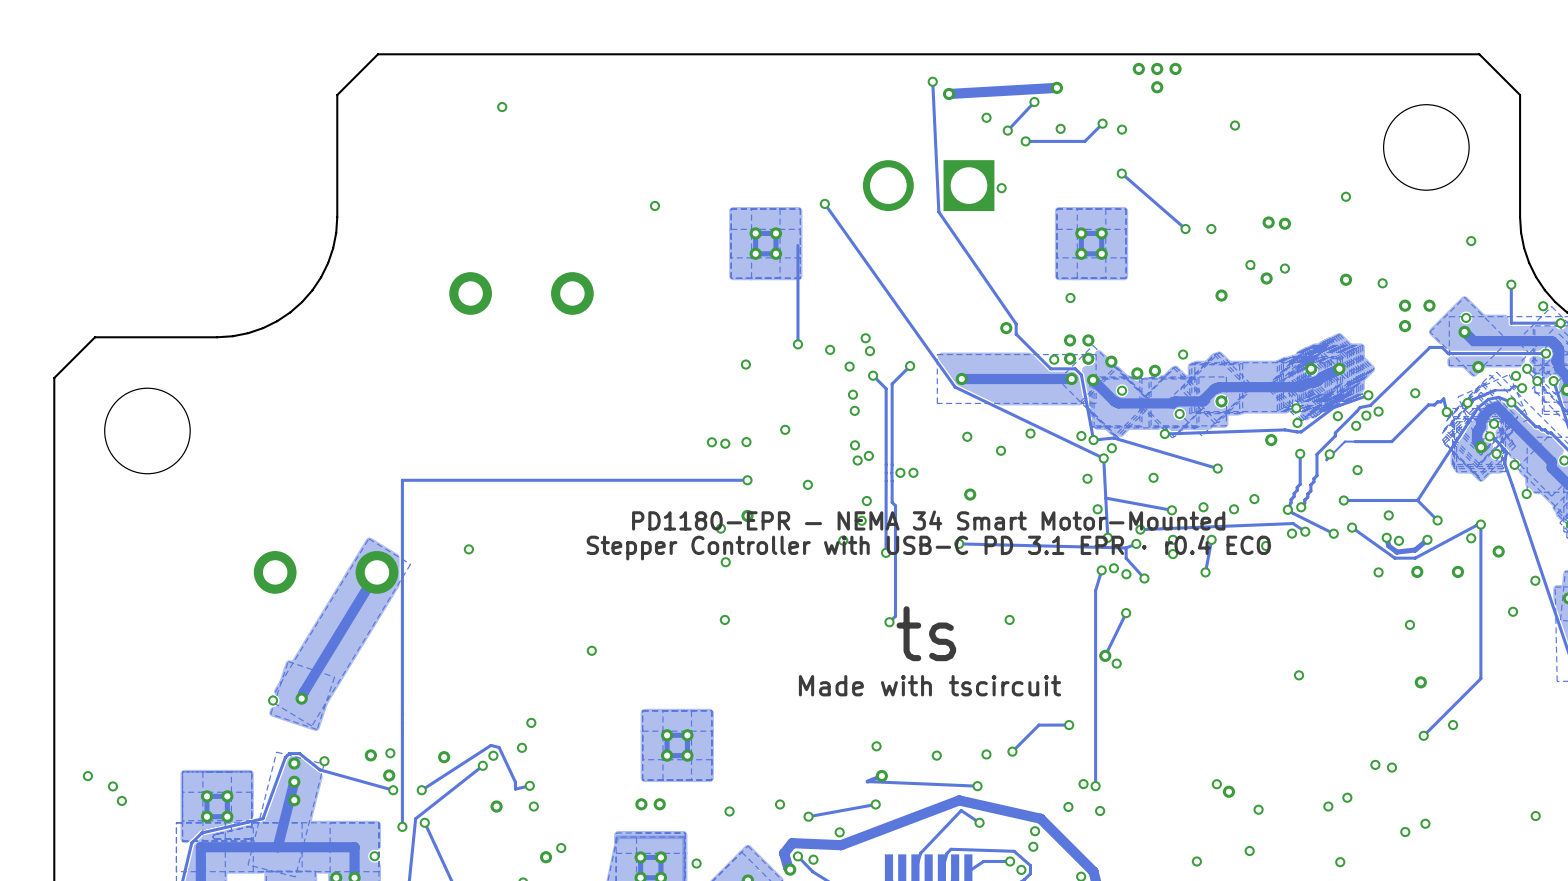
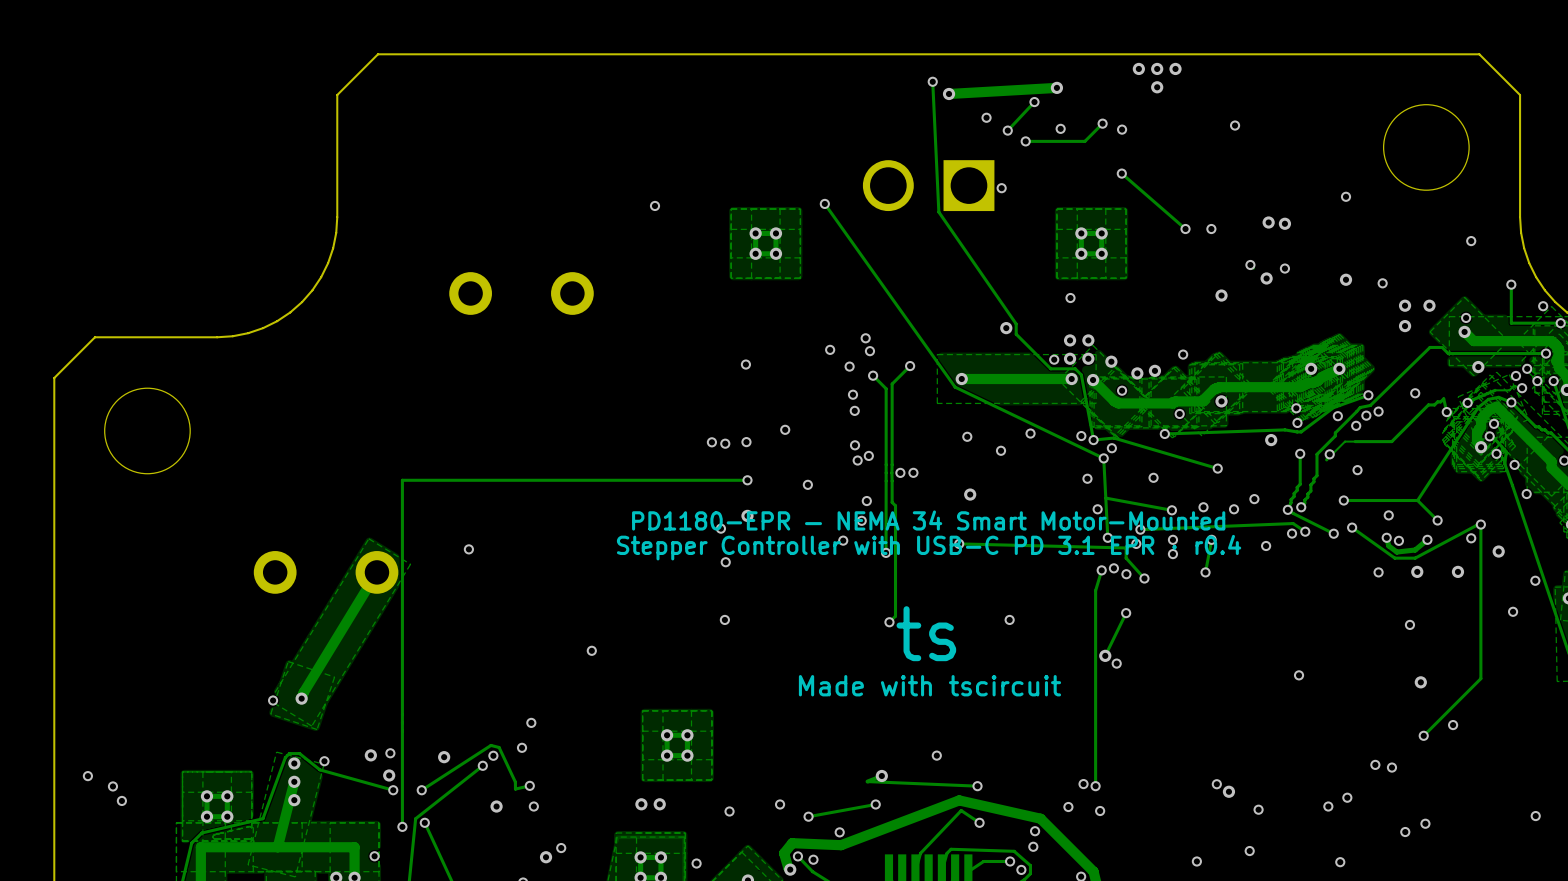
via: (502, 107) -> none
track: (797, 245) (797, 344) -> none
via: (797, 344) -> none
text: Stepper Controller with USB-C PD 3.1 EPR · r0.4 ECO (928, 547) -> Stepper Controller with USB-C PD 3.1 EPR · r0.4 (929, 547)
track: (1069, 725) (1038, 725) (1012, 751) -> none
via: (1069, 725) -> none
via: (876, 746) -> none
via: (1012, 751) -> none
via: (986, 754) -> none

